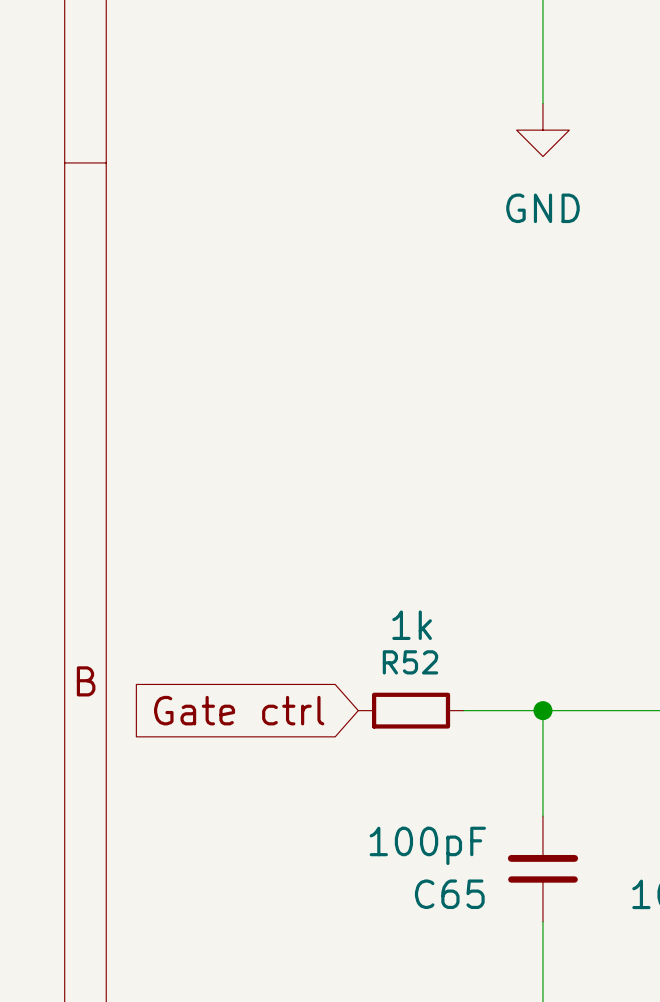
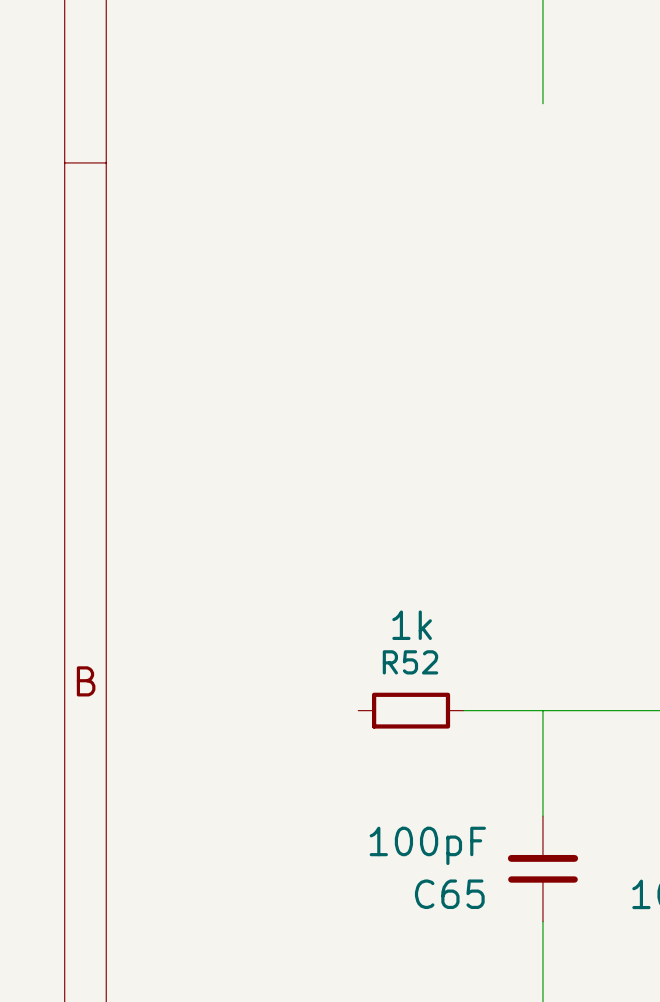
power symbol: GND (542, 130) -> none
global label: Gate ctrl (239, 710) -> none
junction: (542, 710) -> none

